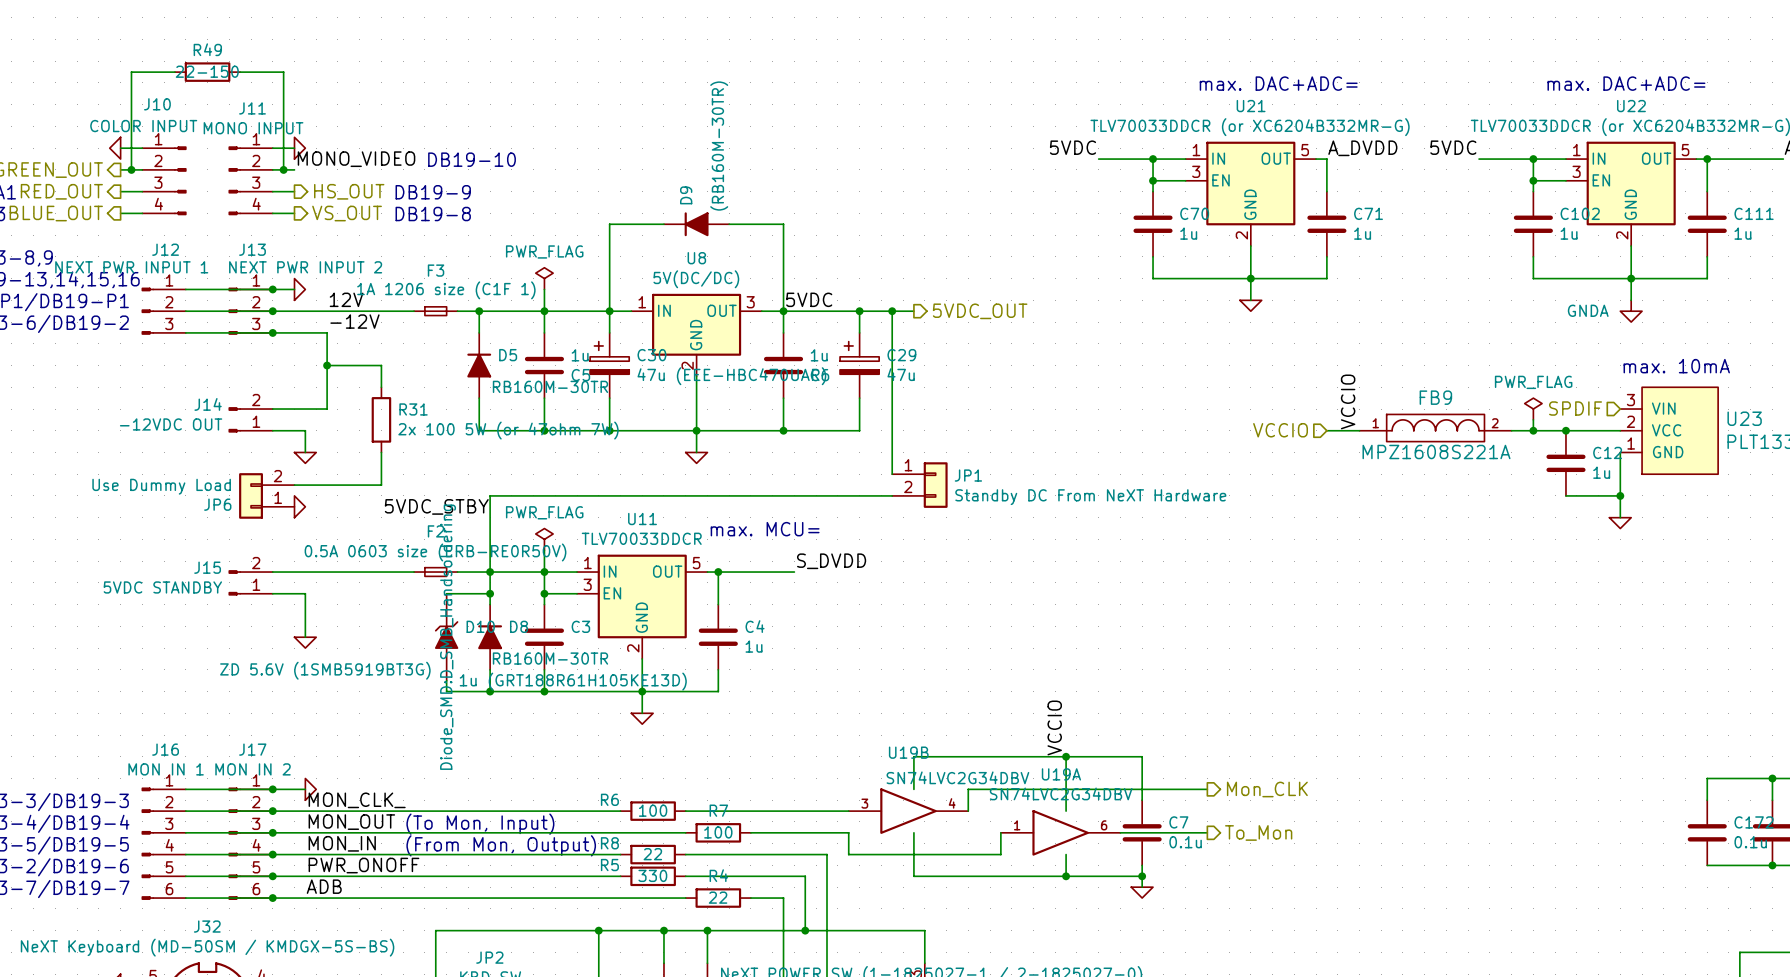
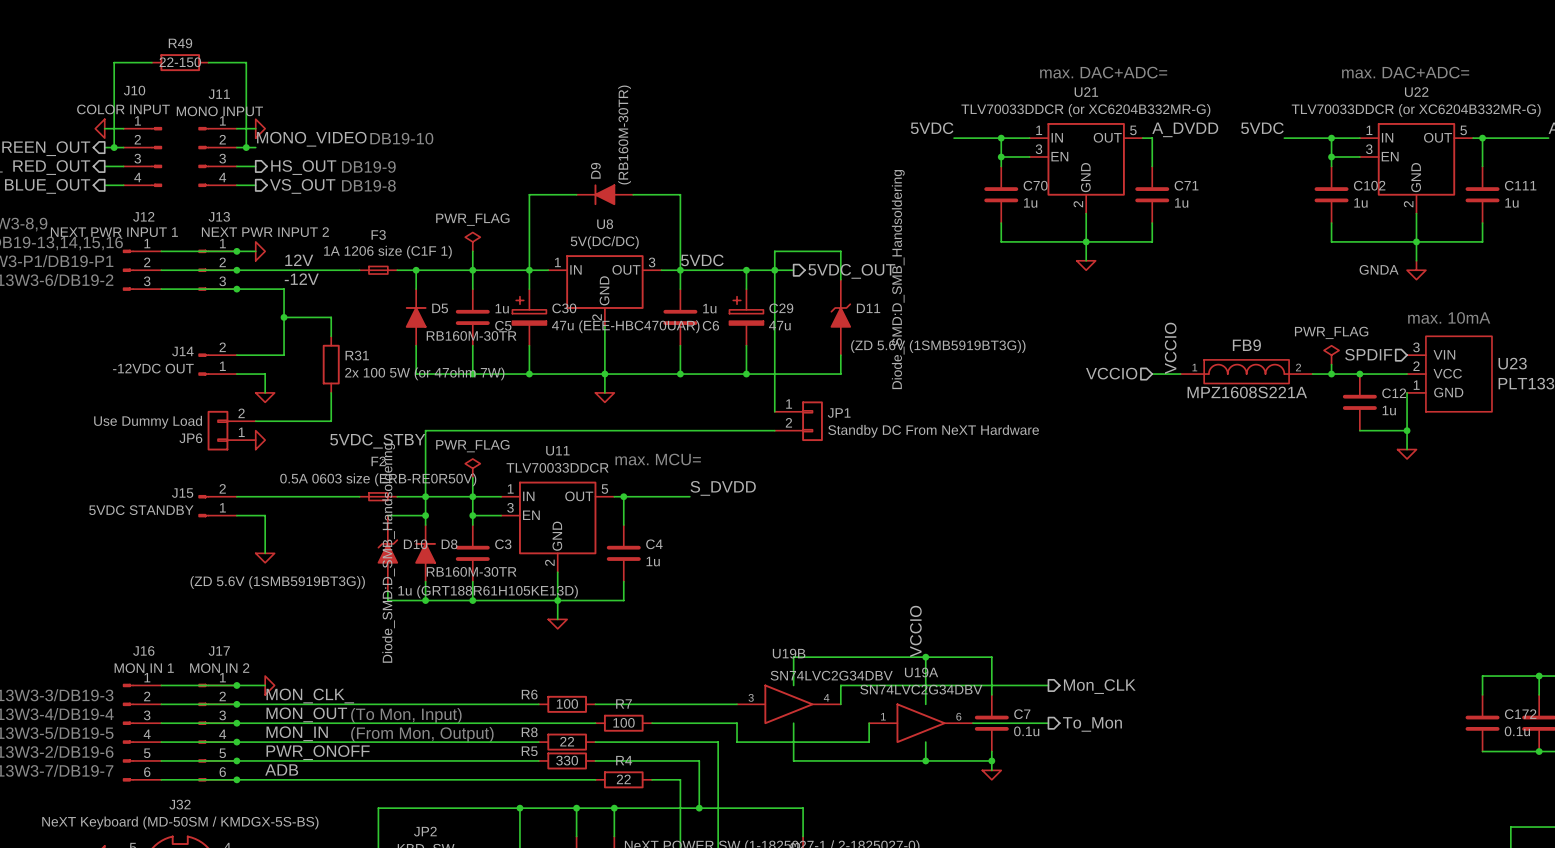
wire: none -> (774, 270) (774, 251) (840, 251) (840, 279)
D11: none -> (ZD 5.6V (1SMB5919BT3G)) (840, 317)
wire: none -> (840, 355) (840, 374) (746, 374)
junction: none -> (746, 374)
D10 value: ZD 5.6V (1SMB5919BT3G) (325, 670) -> (ZD 5.6V (1SMB5919BT3G)) (277, 582)

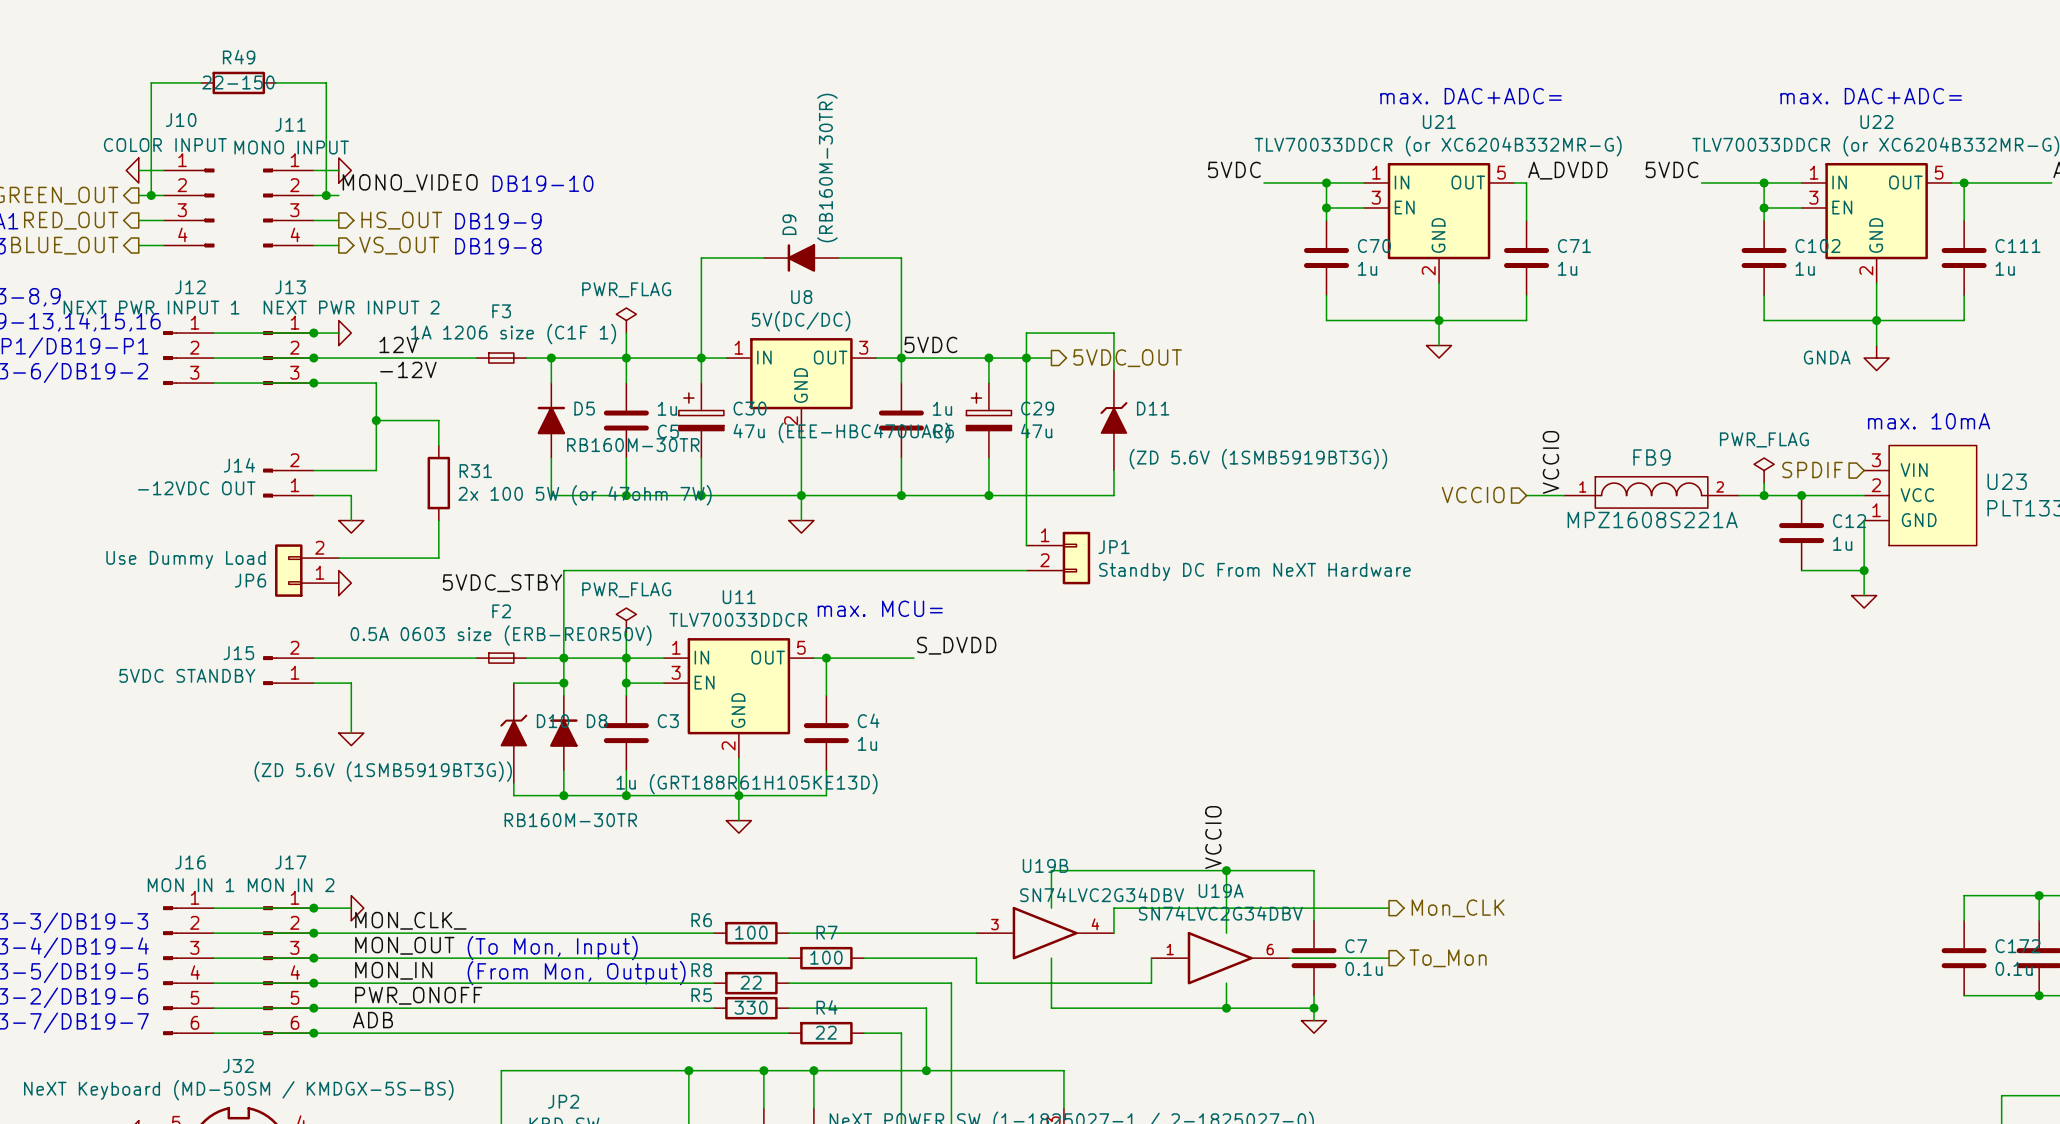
D11 text: Diode_SMD:D_SMB_Handsoldering (898, 279) -> none
D10 text: Diode_SMD:D_SMB_Handsoldering (388, 553) -> none
D8 value position: RB160M-30TR (471, 571) -> RB160M-30TR (570, 820)
C3 value position: 1u (GRT188R61H105KE13D) (488, 591) -> 1u (GRT188R61H105KE13D) (747, 784)

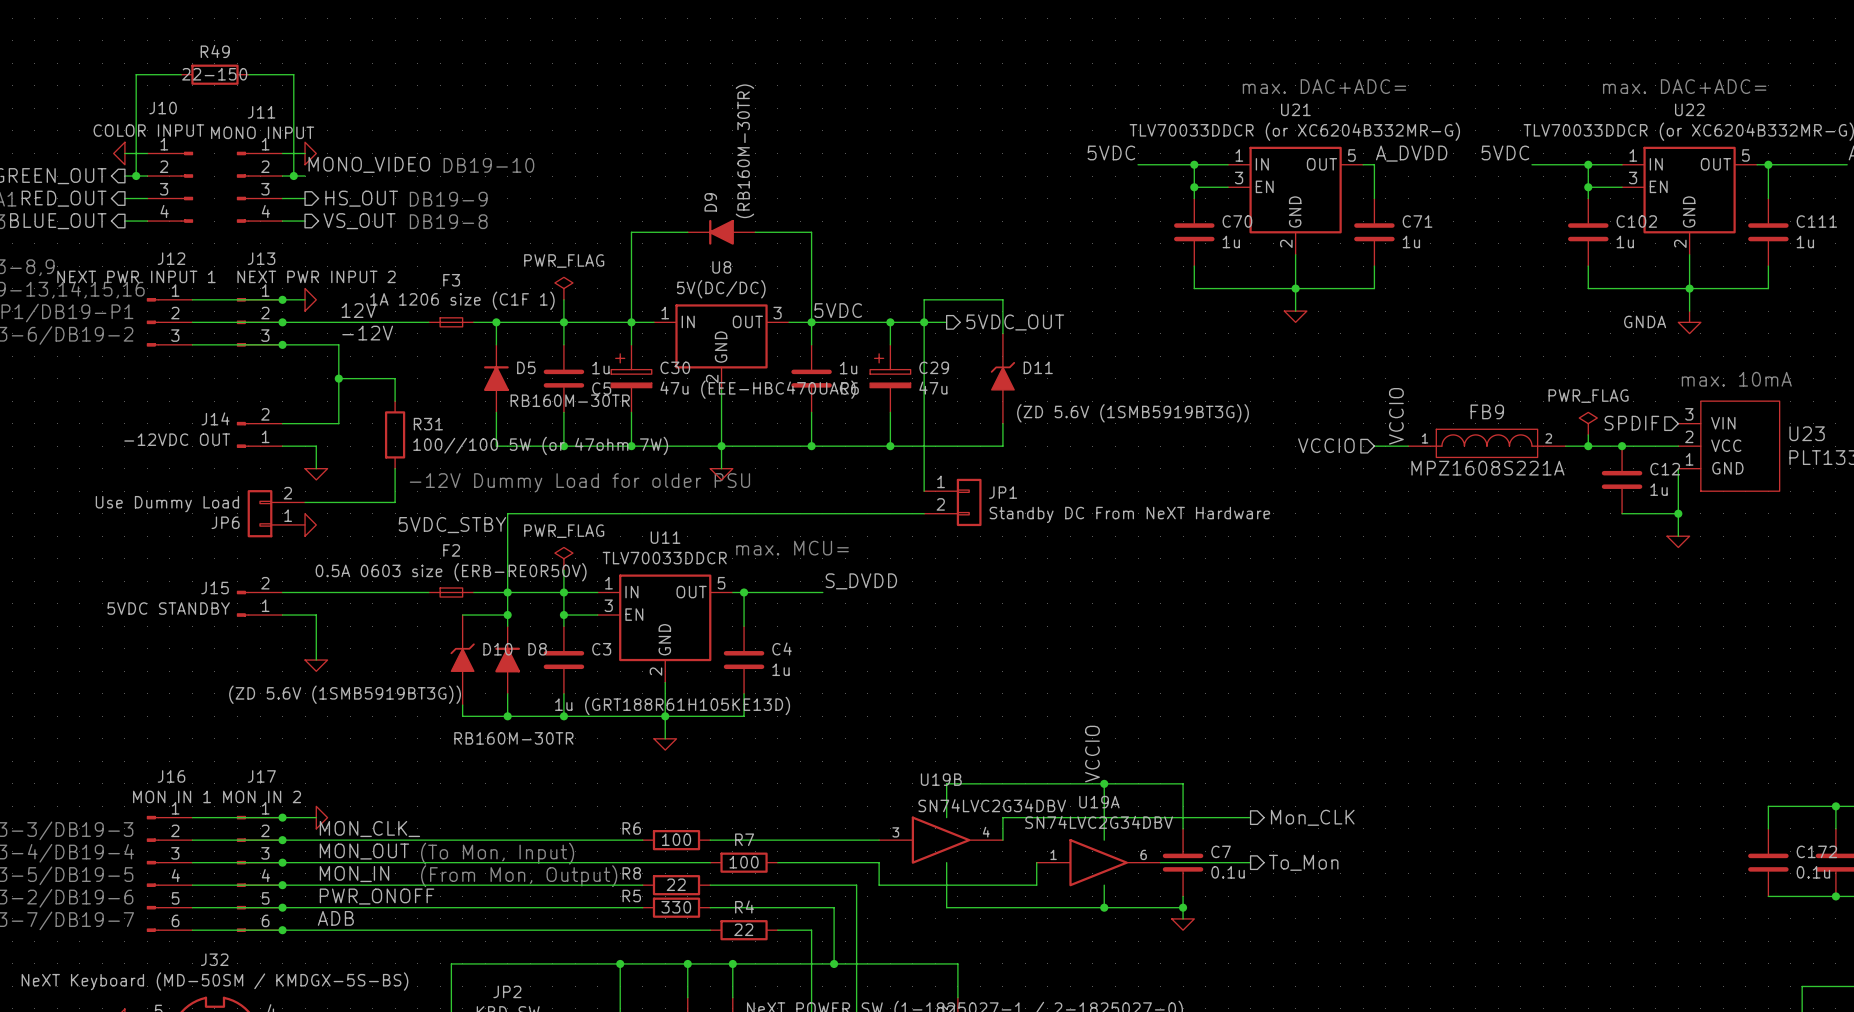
R31 value: 2x 100 5W (or 47ohm 7W) (585, 495) -> 100//100 5W (or 47ohm 7W) (540, 445)
text: none -> -12V Dummy Load for older PSU (579, 482)

